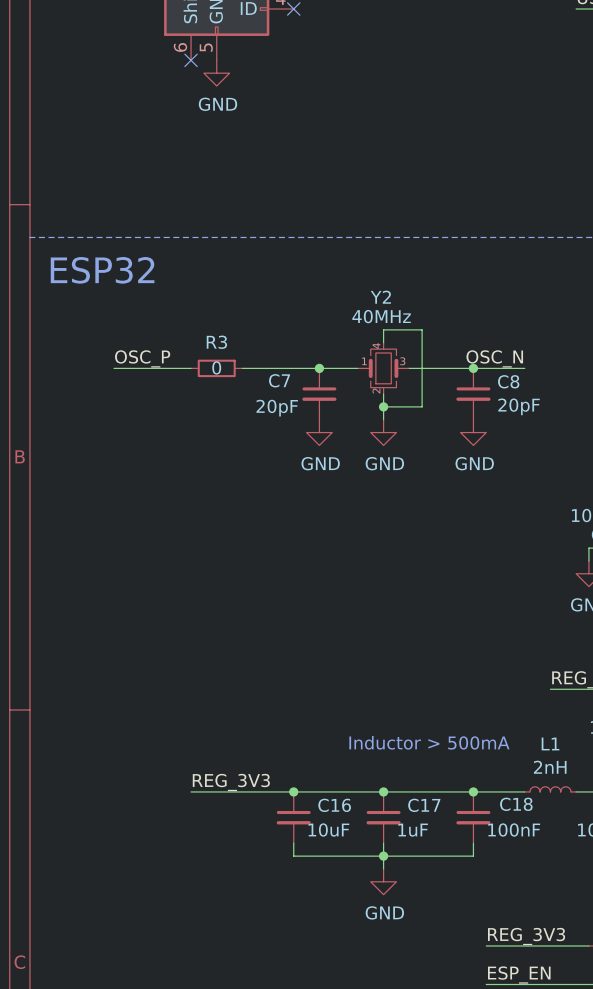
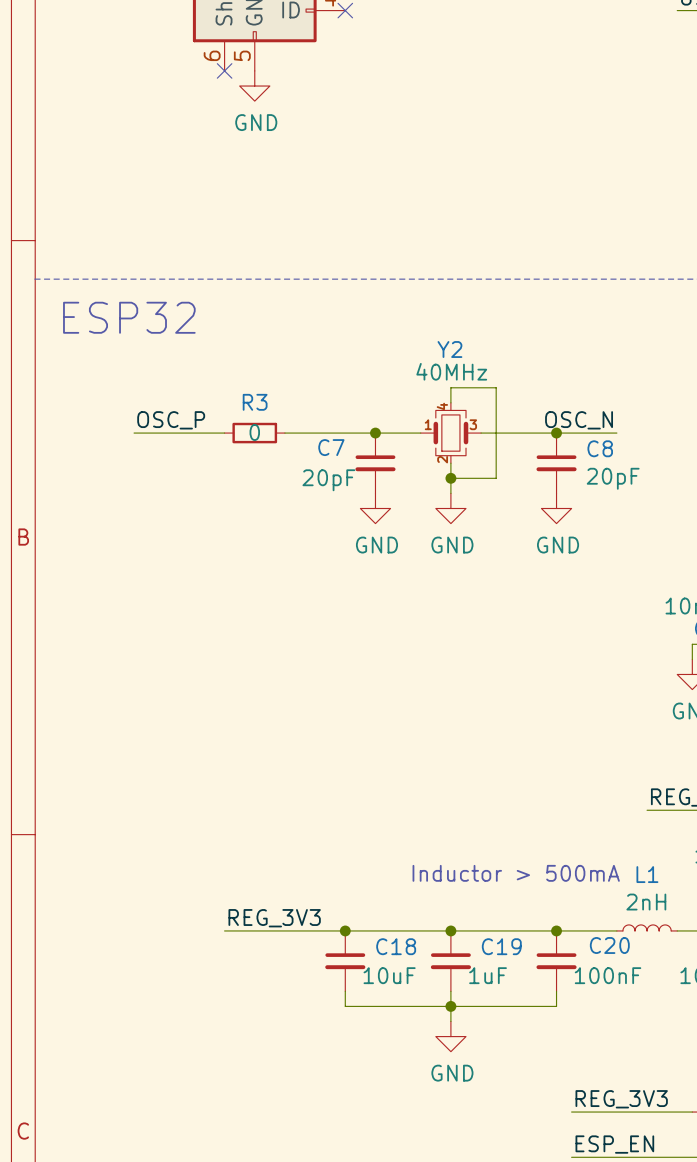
C18 name: C18 (516, 804) -> C20 (609, 945)
C16 name: C16 (334, 805) -> C18 (396, 946)
C17 name: C17 (424, 805) -> C19 (501, 946)

